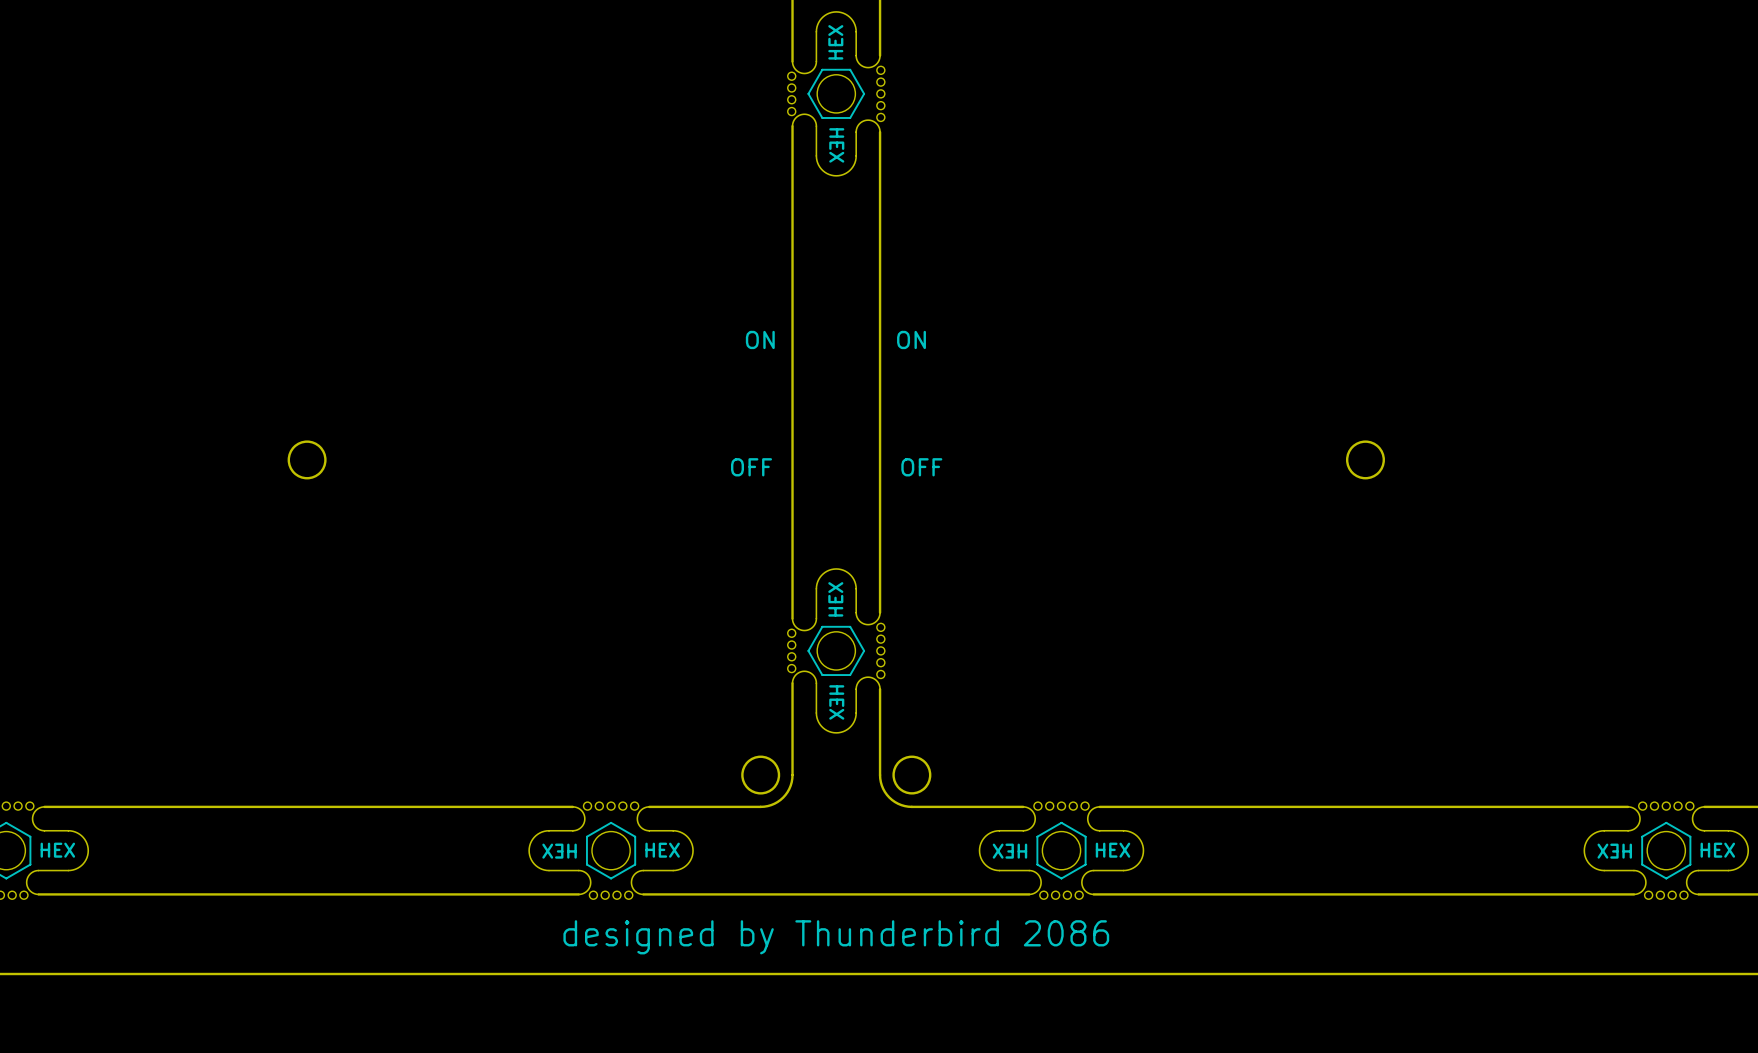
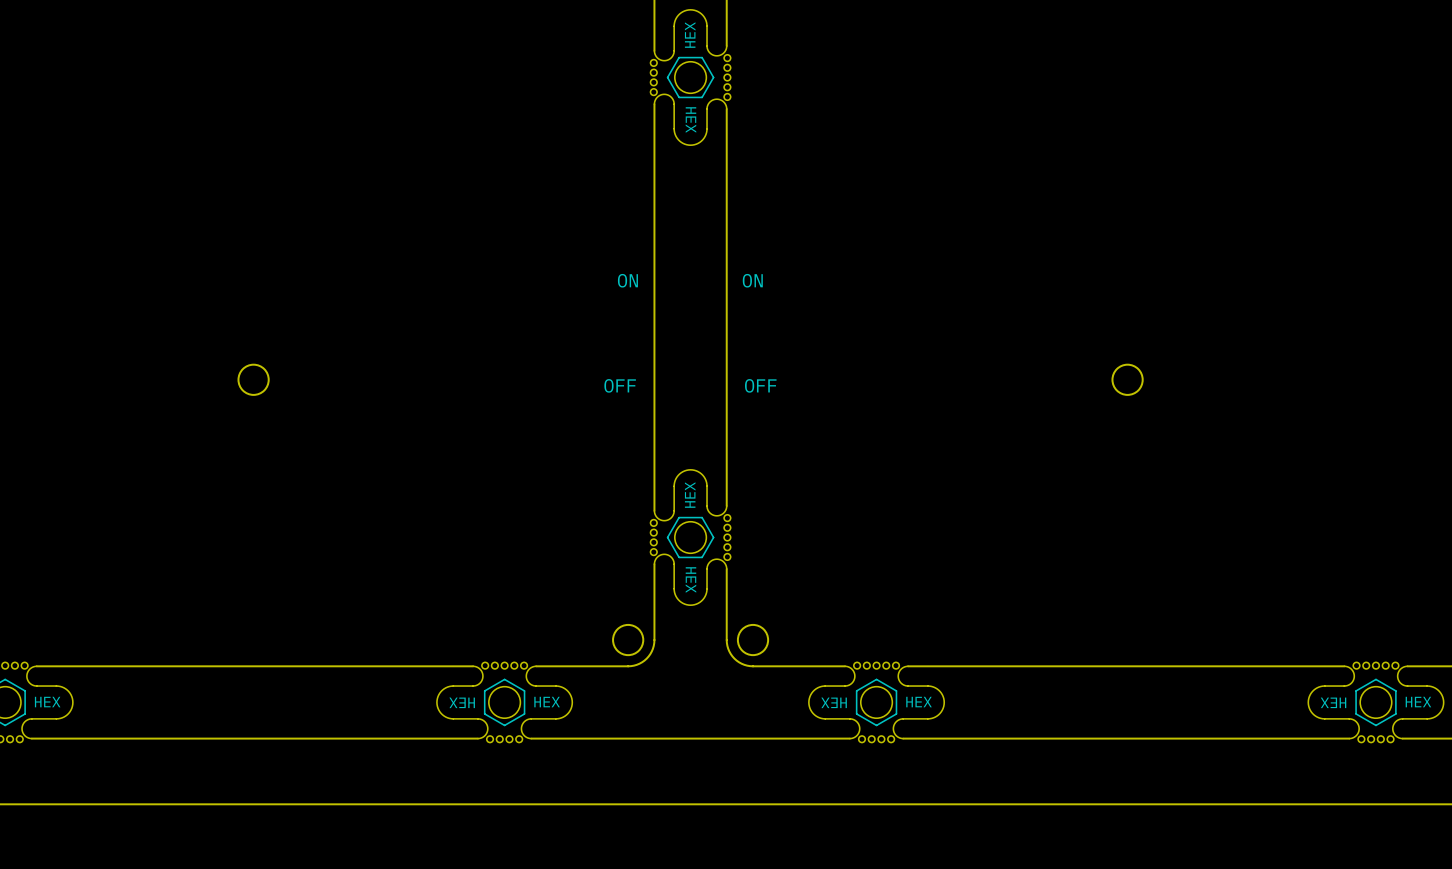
text: designed by Thunderbird 2086 (836, 937) -> none

